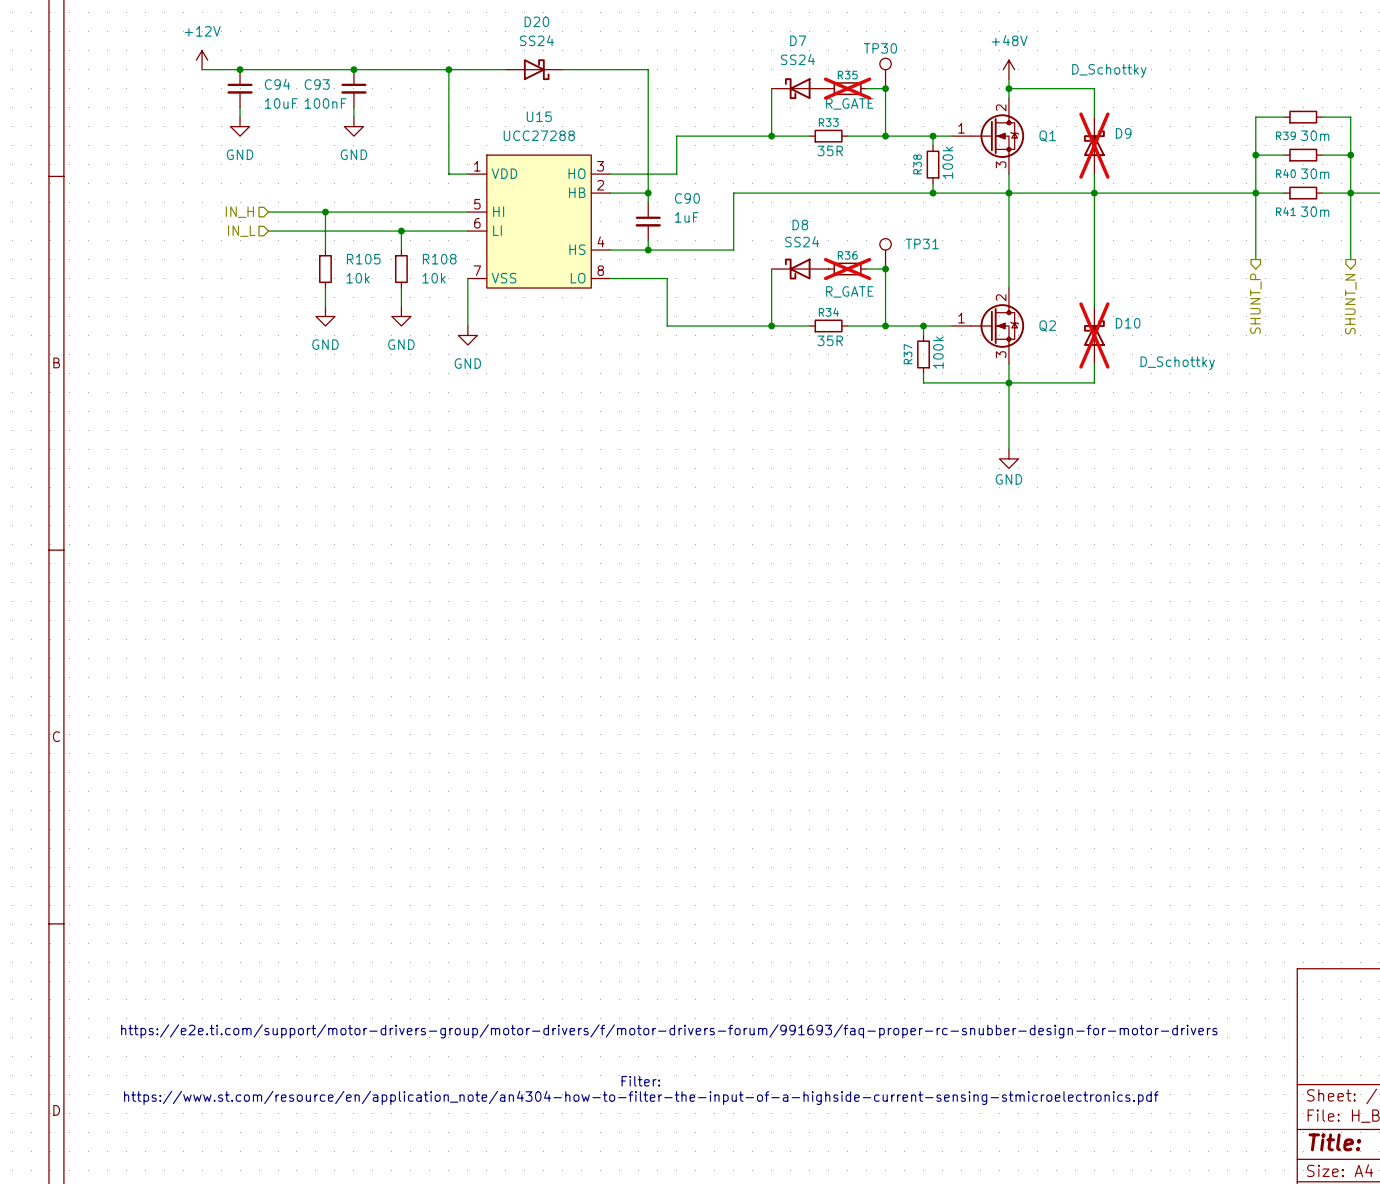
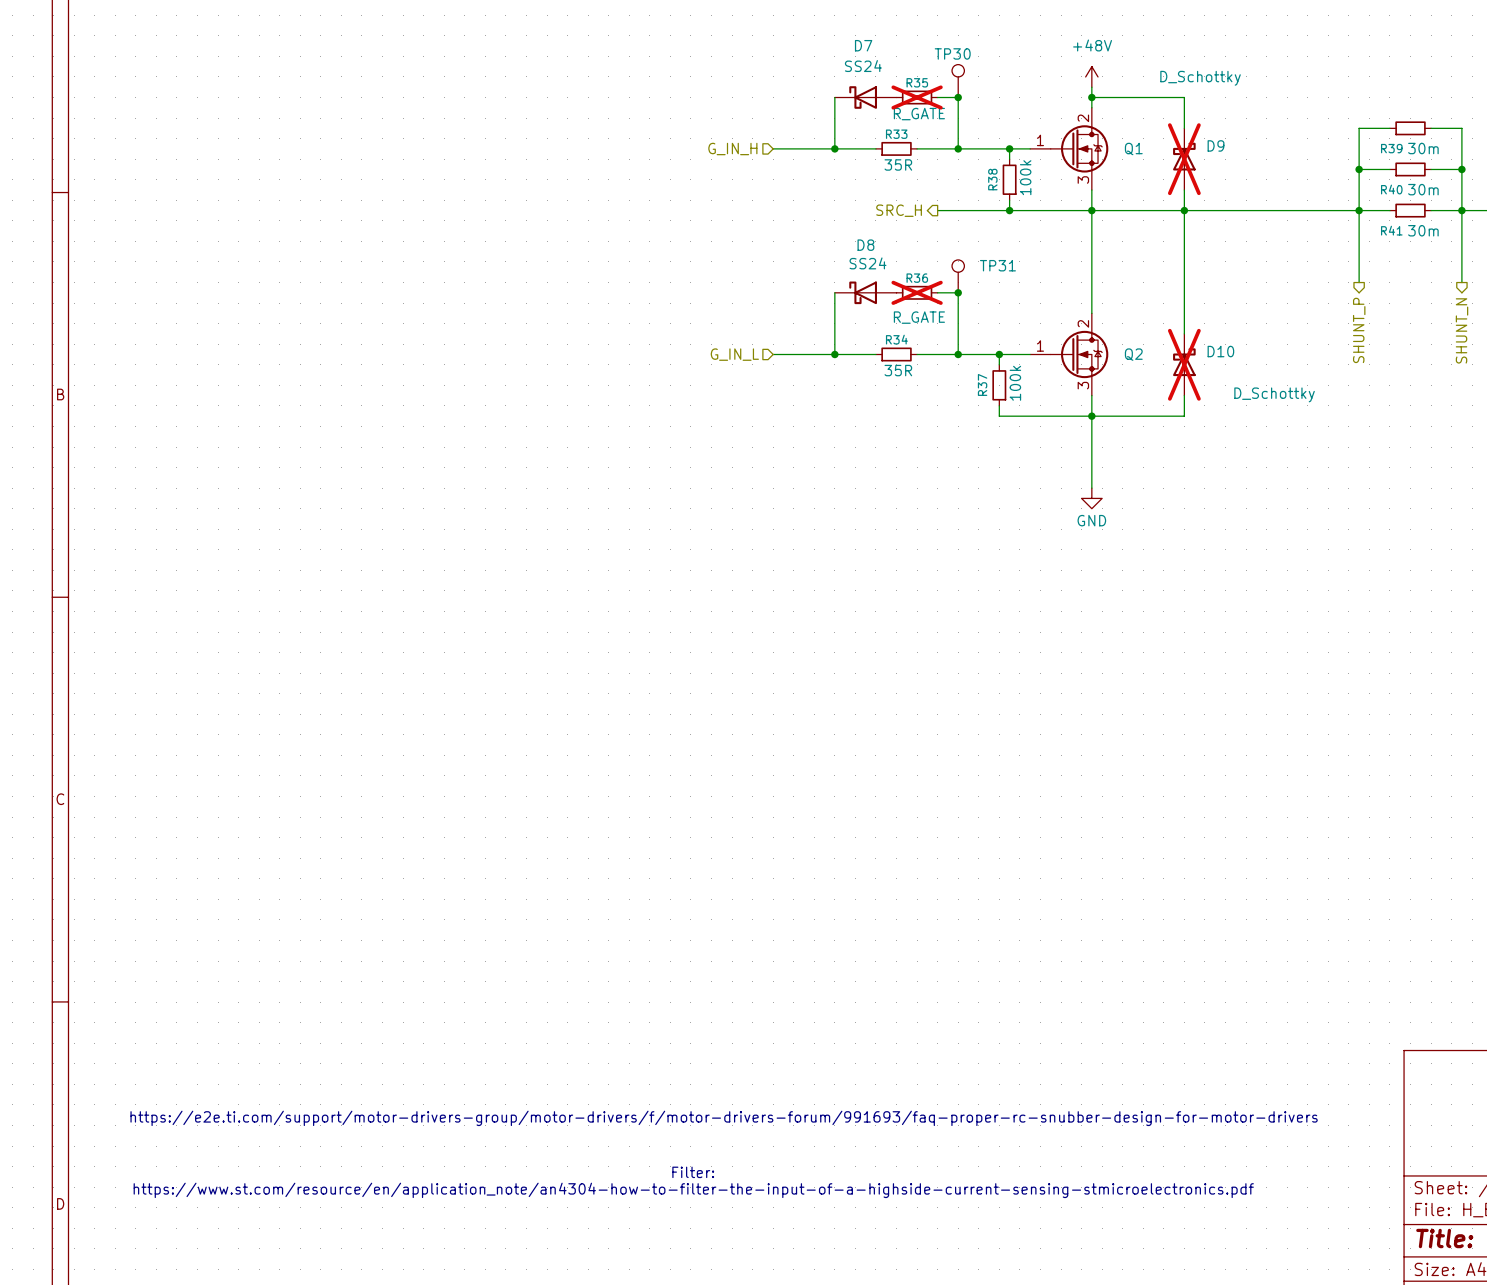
power symbol: +12V (202, 60) -> none
wire: (202, 69) (505, 69) -> none
junction: (240, 69) -> none
junction: (353, 69) -> none
wire: (448, 69) (448, 174) (467, 174) -> none
junction: (448, 69) -> none
D20: SS24 (534, 69) -> none
wire: (562, 69) (648, 69) (648, 202) -> none
C94: 10uF (240, 88) -> none
C93: 100nF (353, 88) -> none
wire: (240, 107) (240, 117) -> none
wire: (353, 107) (353, 117) -> none
power symbol: GND (240, 126) -> none
power symbol: GND (353, 126) -> none
hierarchical label: none -> G_IN_H (732, 149)
wire: (714, 136) (676, 136) (676, 174) (610, 174) -> none
wire: (610, 193) (648, 193) -> none
junction: (648, 193) -> none
hierarchical label: none -> SRC_H (899, 210)
wire: (866, 193) (733, 193) (733, 250) (610, 250) -> none
hierarchical label: IN_H (239, 212) -> none
wire: (268, 212) (467, 212) -> none
wire: (325, 212) (325, 250) -> none
junction: (325, 212) -> none
U15: UCC27288 (539, 221) -> none
C90: 1uF (648, 221) -> none
hierarchical label: IN_L (241, 231) -> none
wire: (268, 231) (467, 231) -> none
wire: (401, 231) (401, 250) -> none
junction: (401, 231) -> none
wire: (648, 240) (648, 250) -> none
junction: (648, 250) -> none
R105: 10k (325, 269) -> none
R108: 10k (401, 269) -> none
wire: (467, 278) (467, 325) -> none
wire: (610, 278) (667, 278) (667, 325) (714, 325) -> none
wire: (325, 288) (325, 306) -> none
wire: (401, 288) (401, 306) -> none
power symbol: GND (325, 316) -> none
power symbol: GND (401, 316) -> none
hierarchical label: none -> G_IN_L (734, 354)
power symbol: GND (467, 335) -> none

